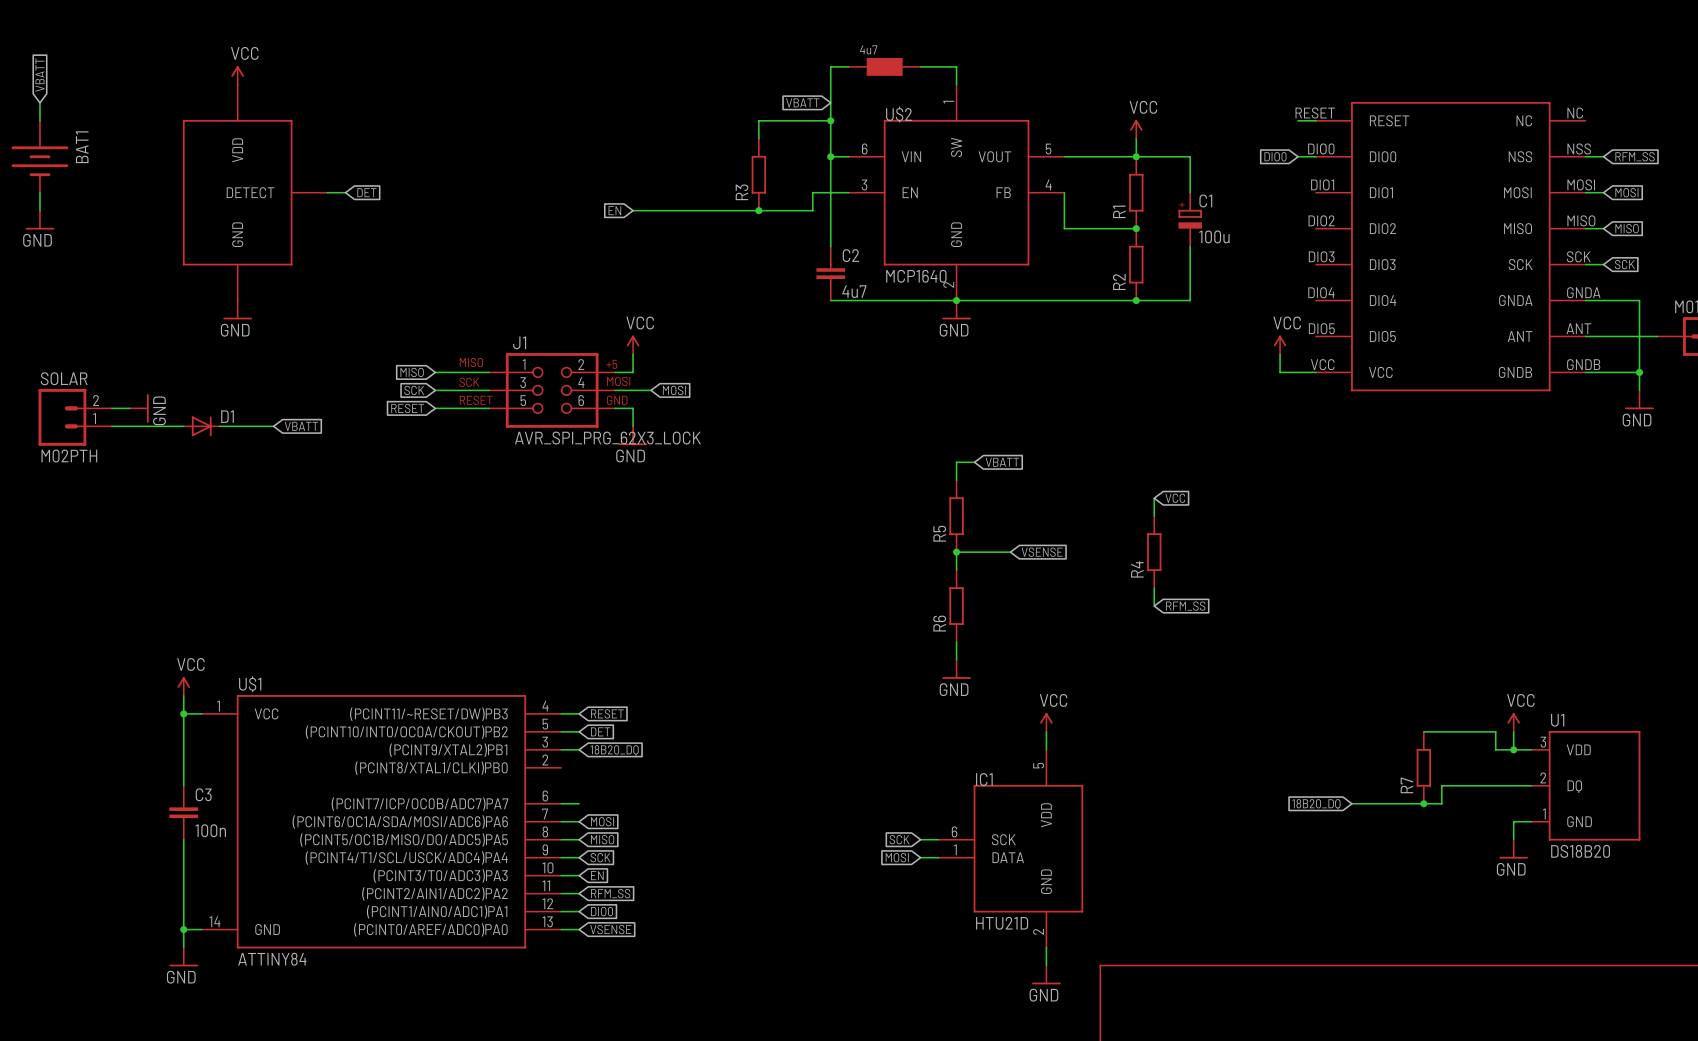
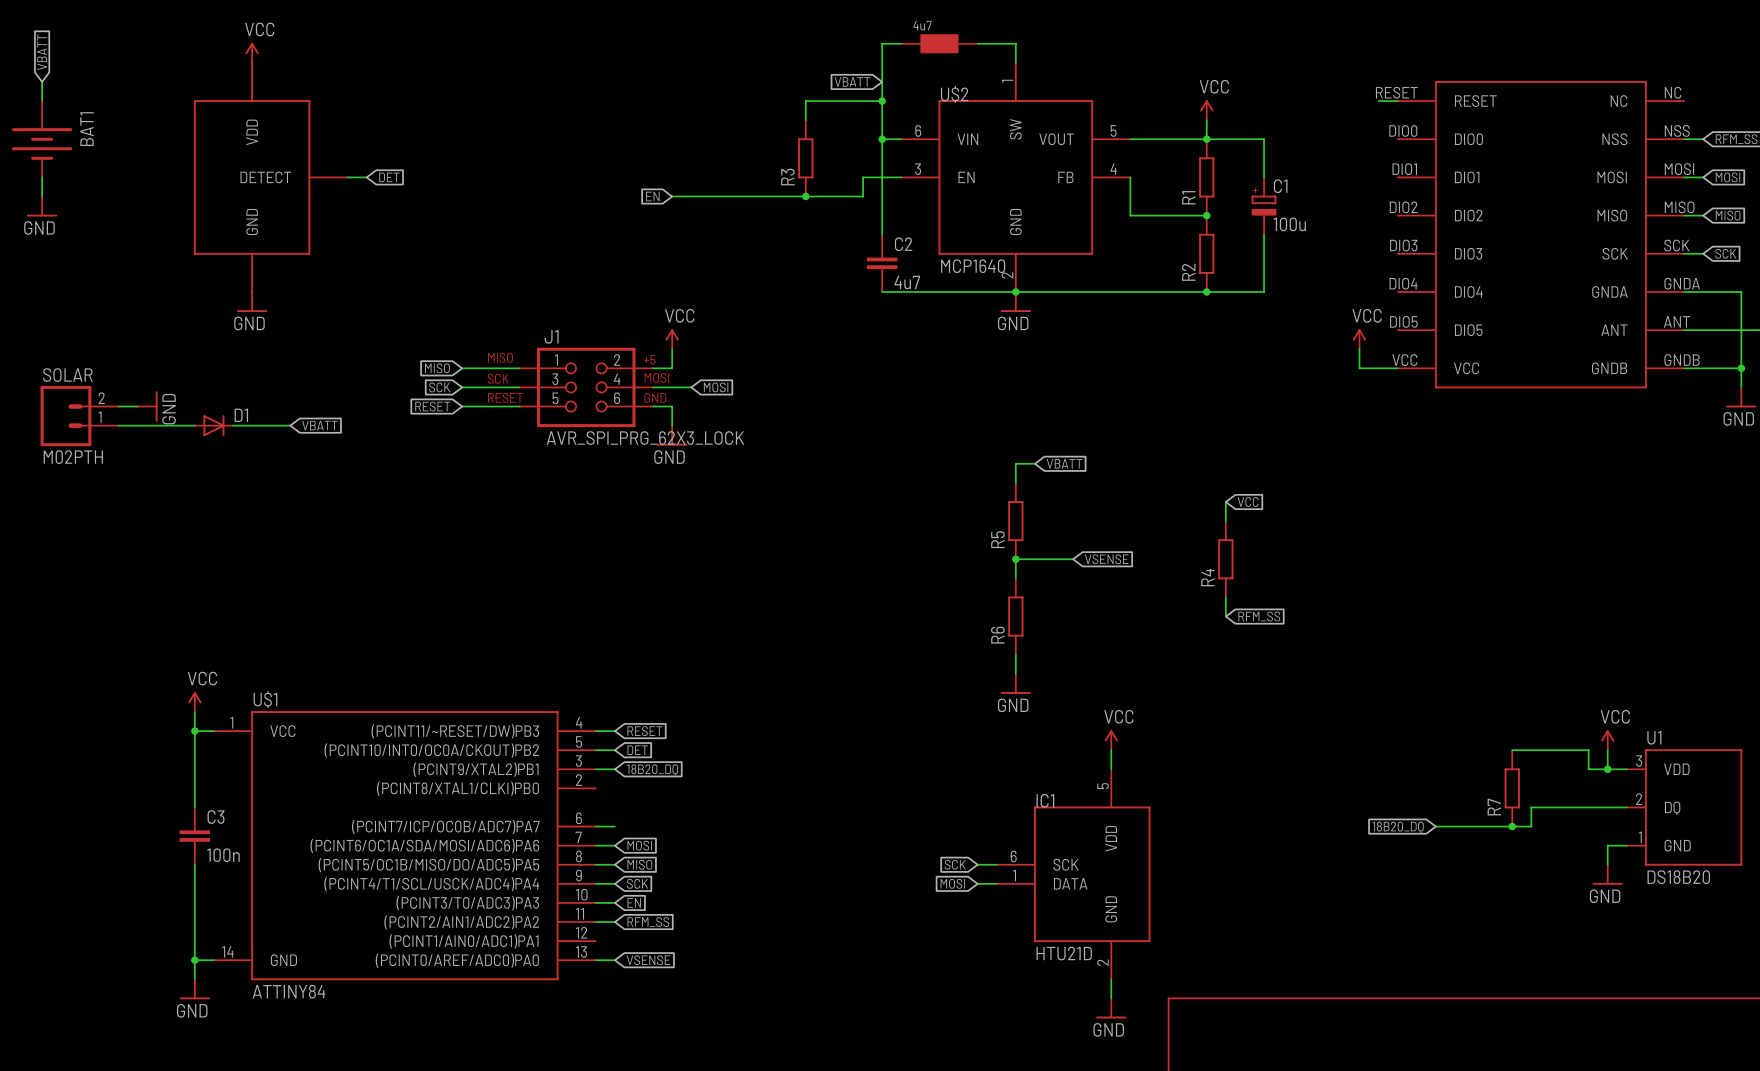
global label: DIO0 (1275, 156) -> none
wire: (1298, 156) (1316, 156) -> none
wire: (561, 911) (579, 911) -> none
global label: DIO0 (601, 911) -> none

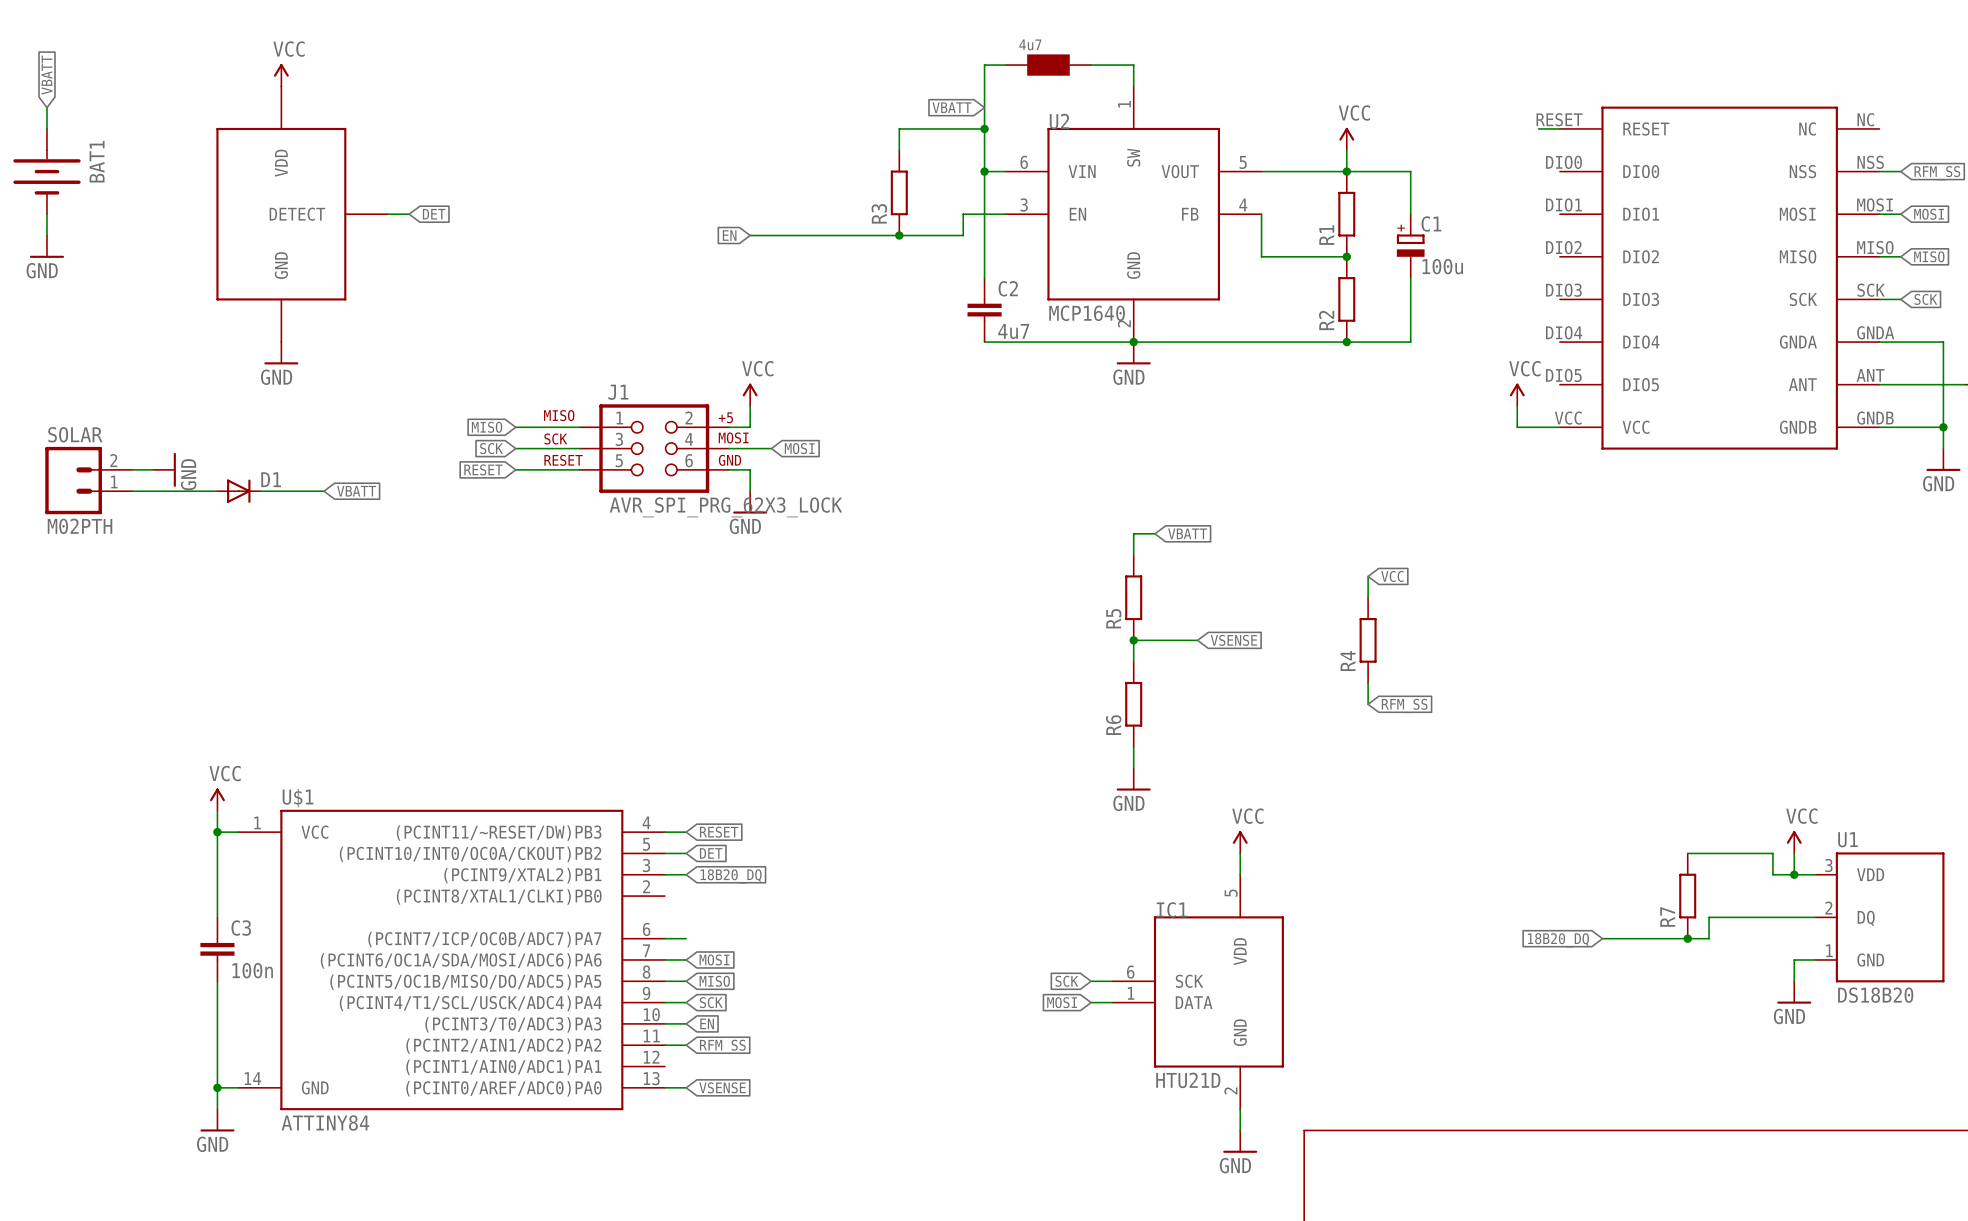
U$2 name: U$2 (954, 94) -> U2 (1059, 121)

